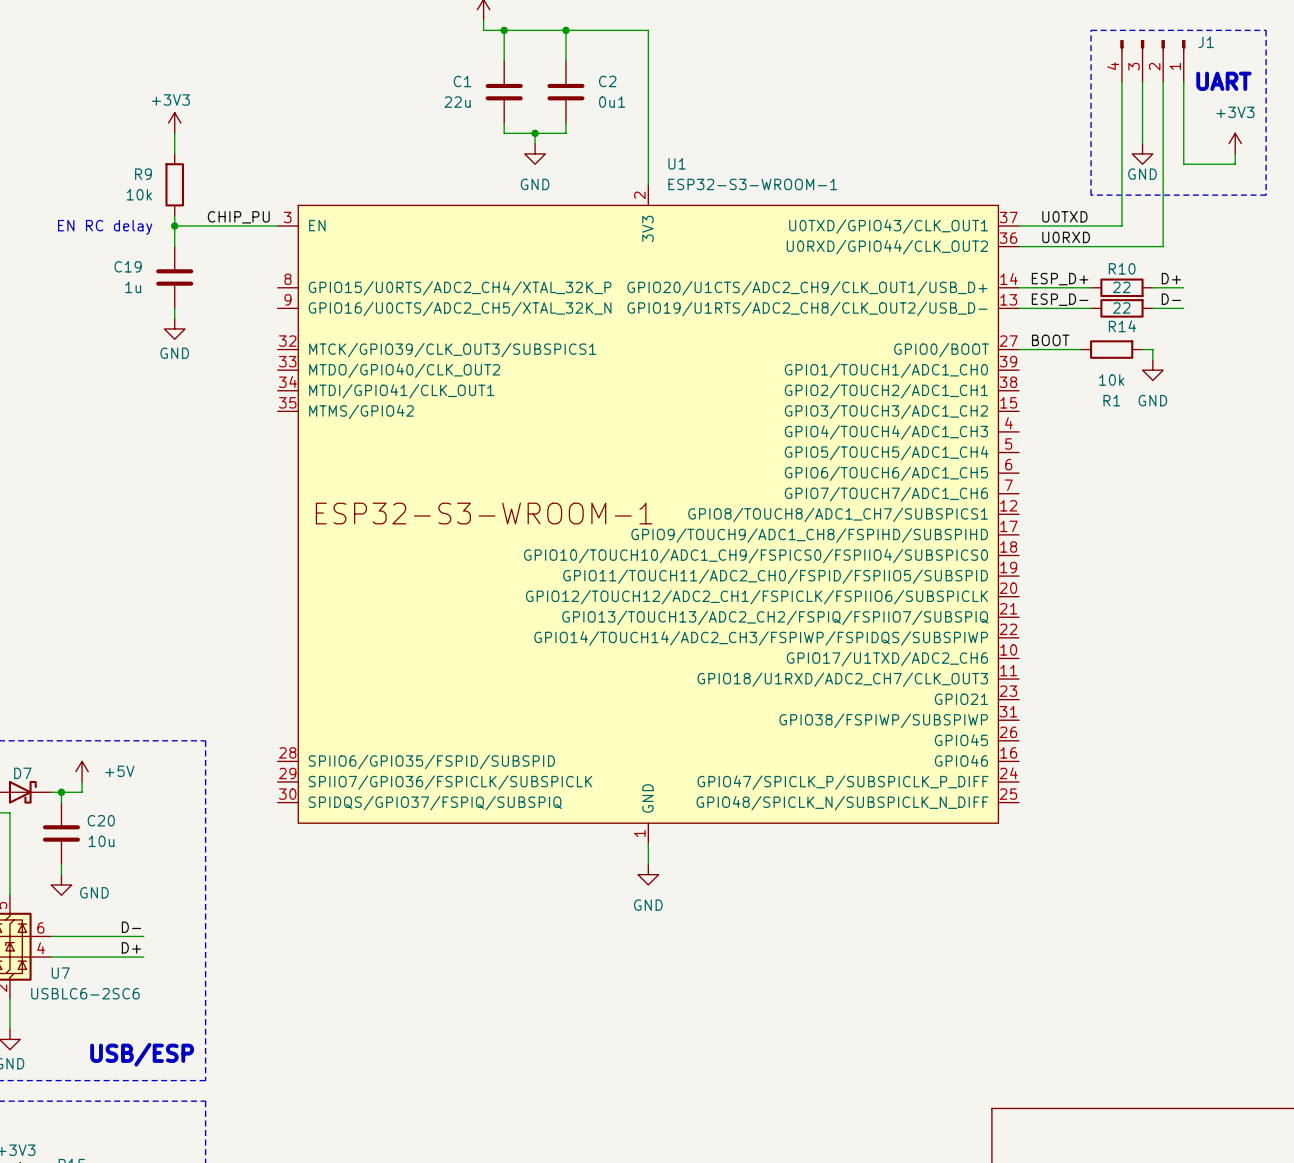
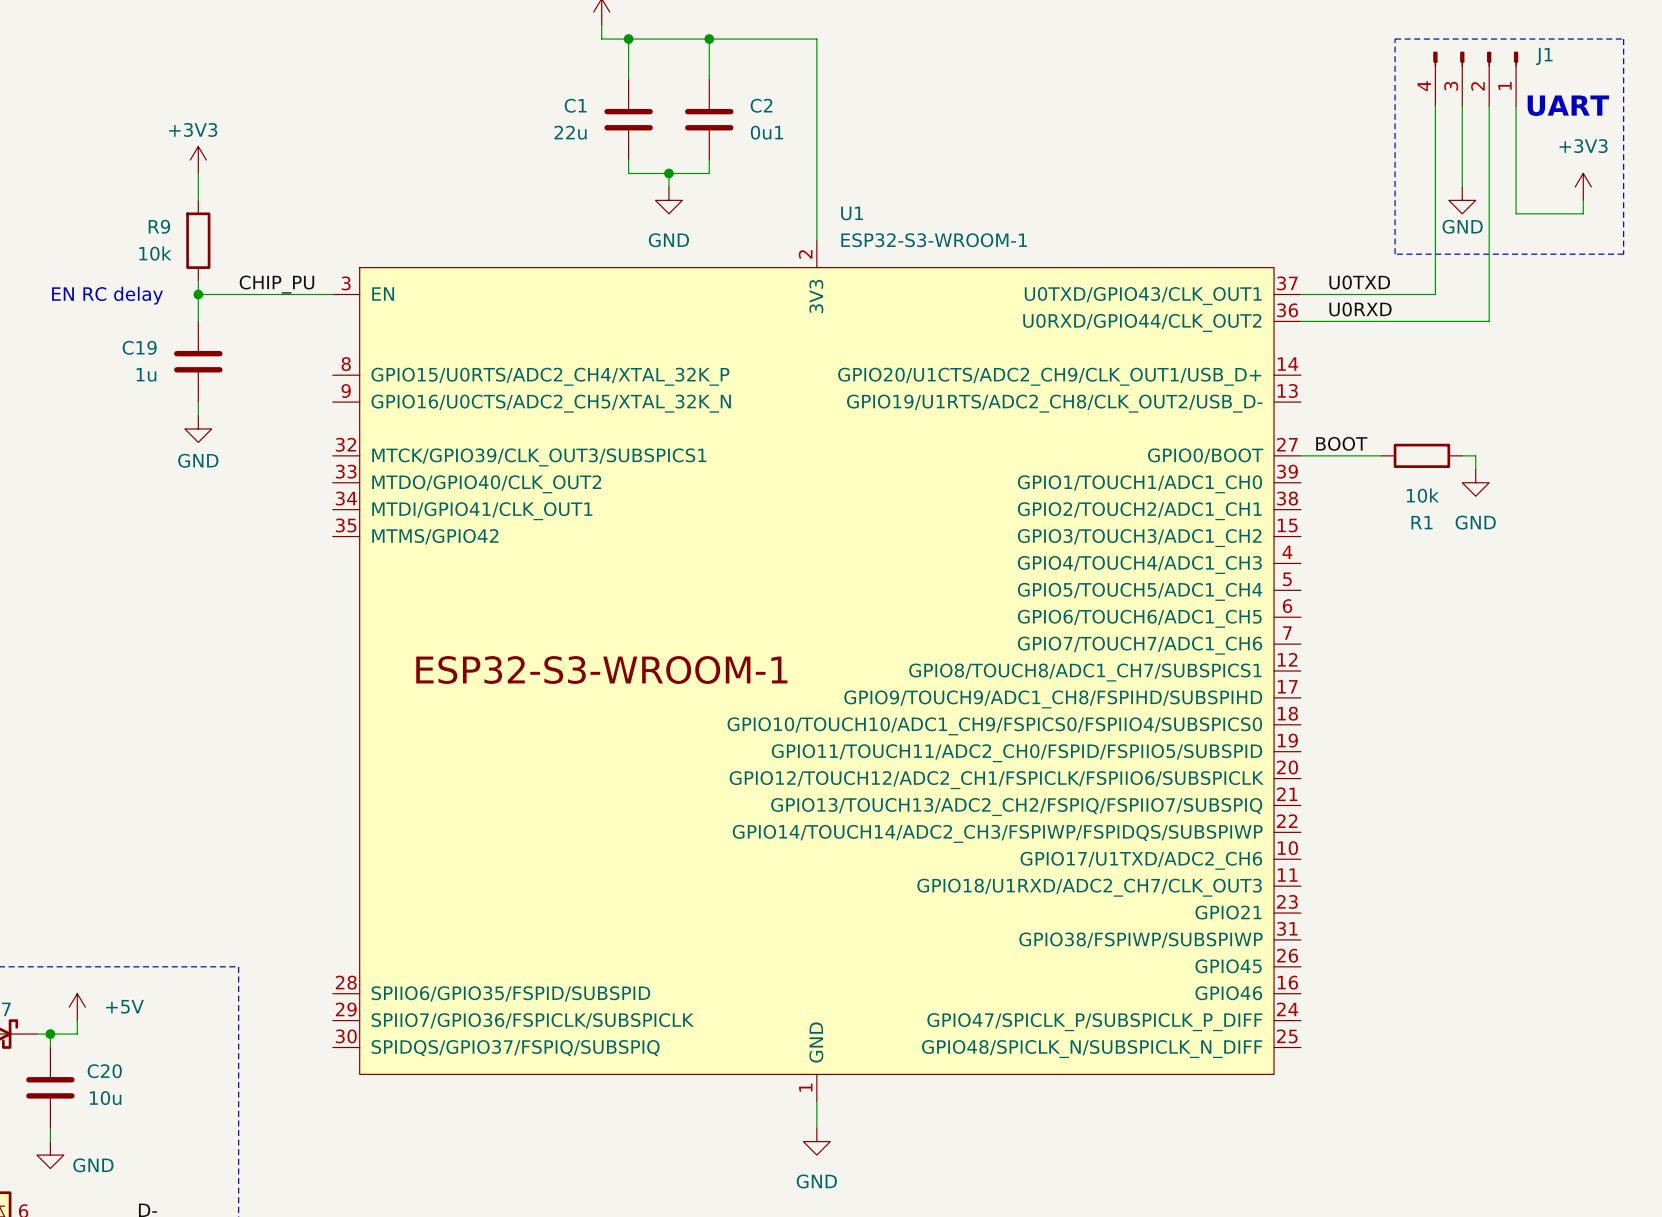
label: D+ (1171, 278) -> none
label: ESP_D+ (1060, 279) -> none
wire: (1019, 287) (1091, 287) -> none
R10: 22 (1121, 287) -> none
wire: (1152, 287) (1183, 287) -> none
label: ESP_D- (1060, 299) -> none
label: D- (1171, 299) -> none
wire: (1019, 308) (1091, 308) -> none
R14: 22 (1121, 308) -> none
wire: (1152, 308) (1183, 308) -> none

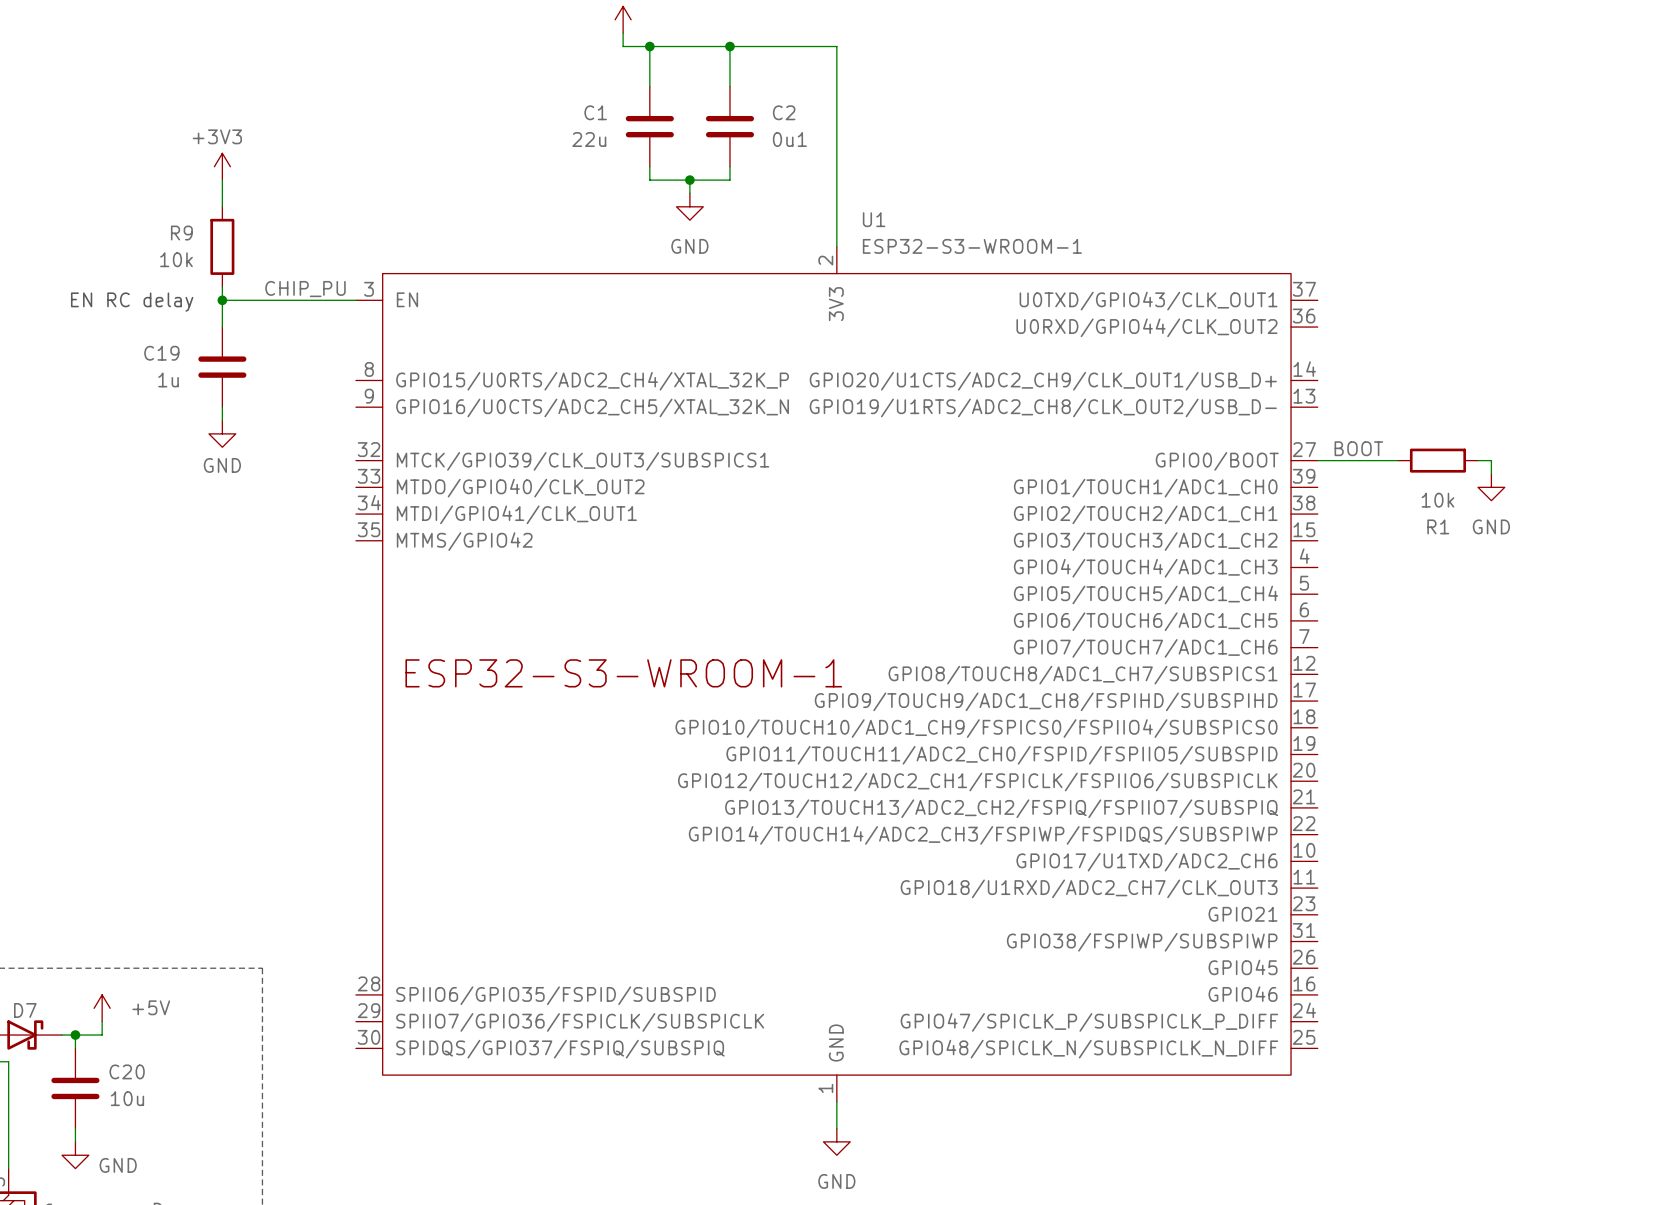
line: (1395, 39) (1623, 39) (1623, 254) (1395, 254) (1395, 39) -> none
J1: (1475, 78) -> none
text: UART (1568, 105) -> none
wire: (1435, 106) (1435, 294) (1300, 294) -> none
wire: (1462, 106) (1462, 186) -> none
wire: (1489, 106) (1489, 321) (1300, 321) -> none
wire: (1516, 106) (1516, 213) (1583, 213) (1583, 200) -> none
power symbol: +3V3 (1583, 186) -> none
power symbol: GND (1462, 200) -> none
label: U0TXD (1359, 282) -> none
label: U0RXD (1360, 309) -> none

